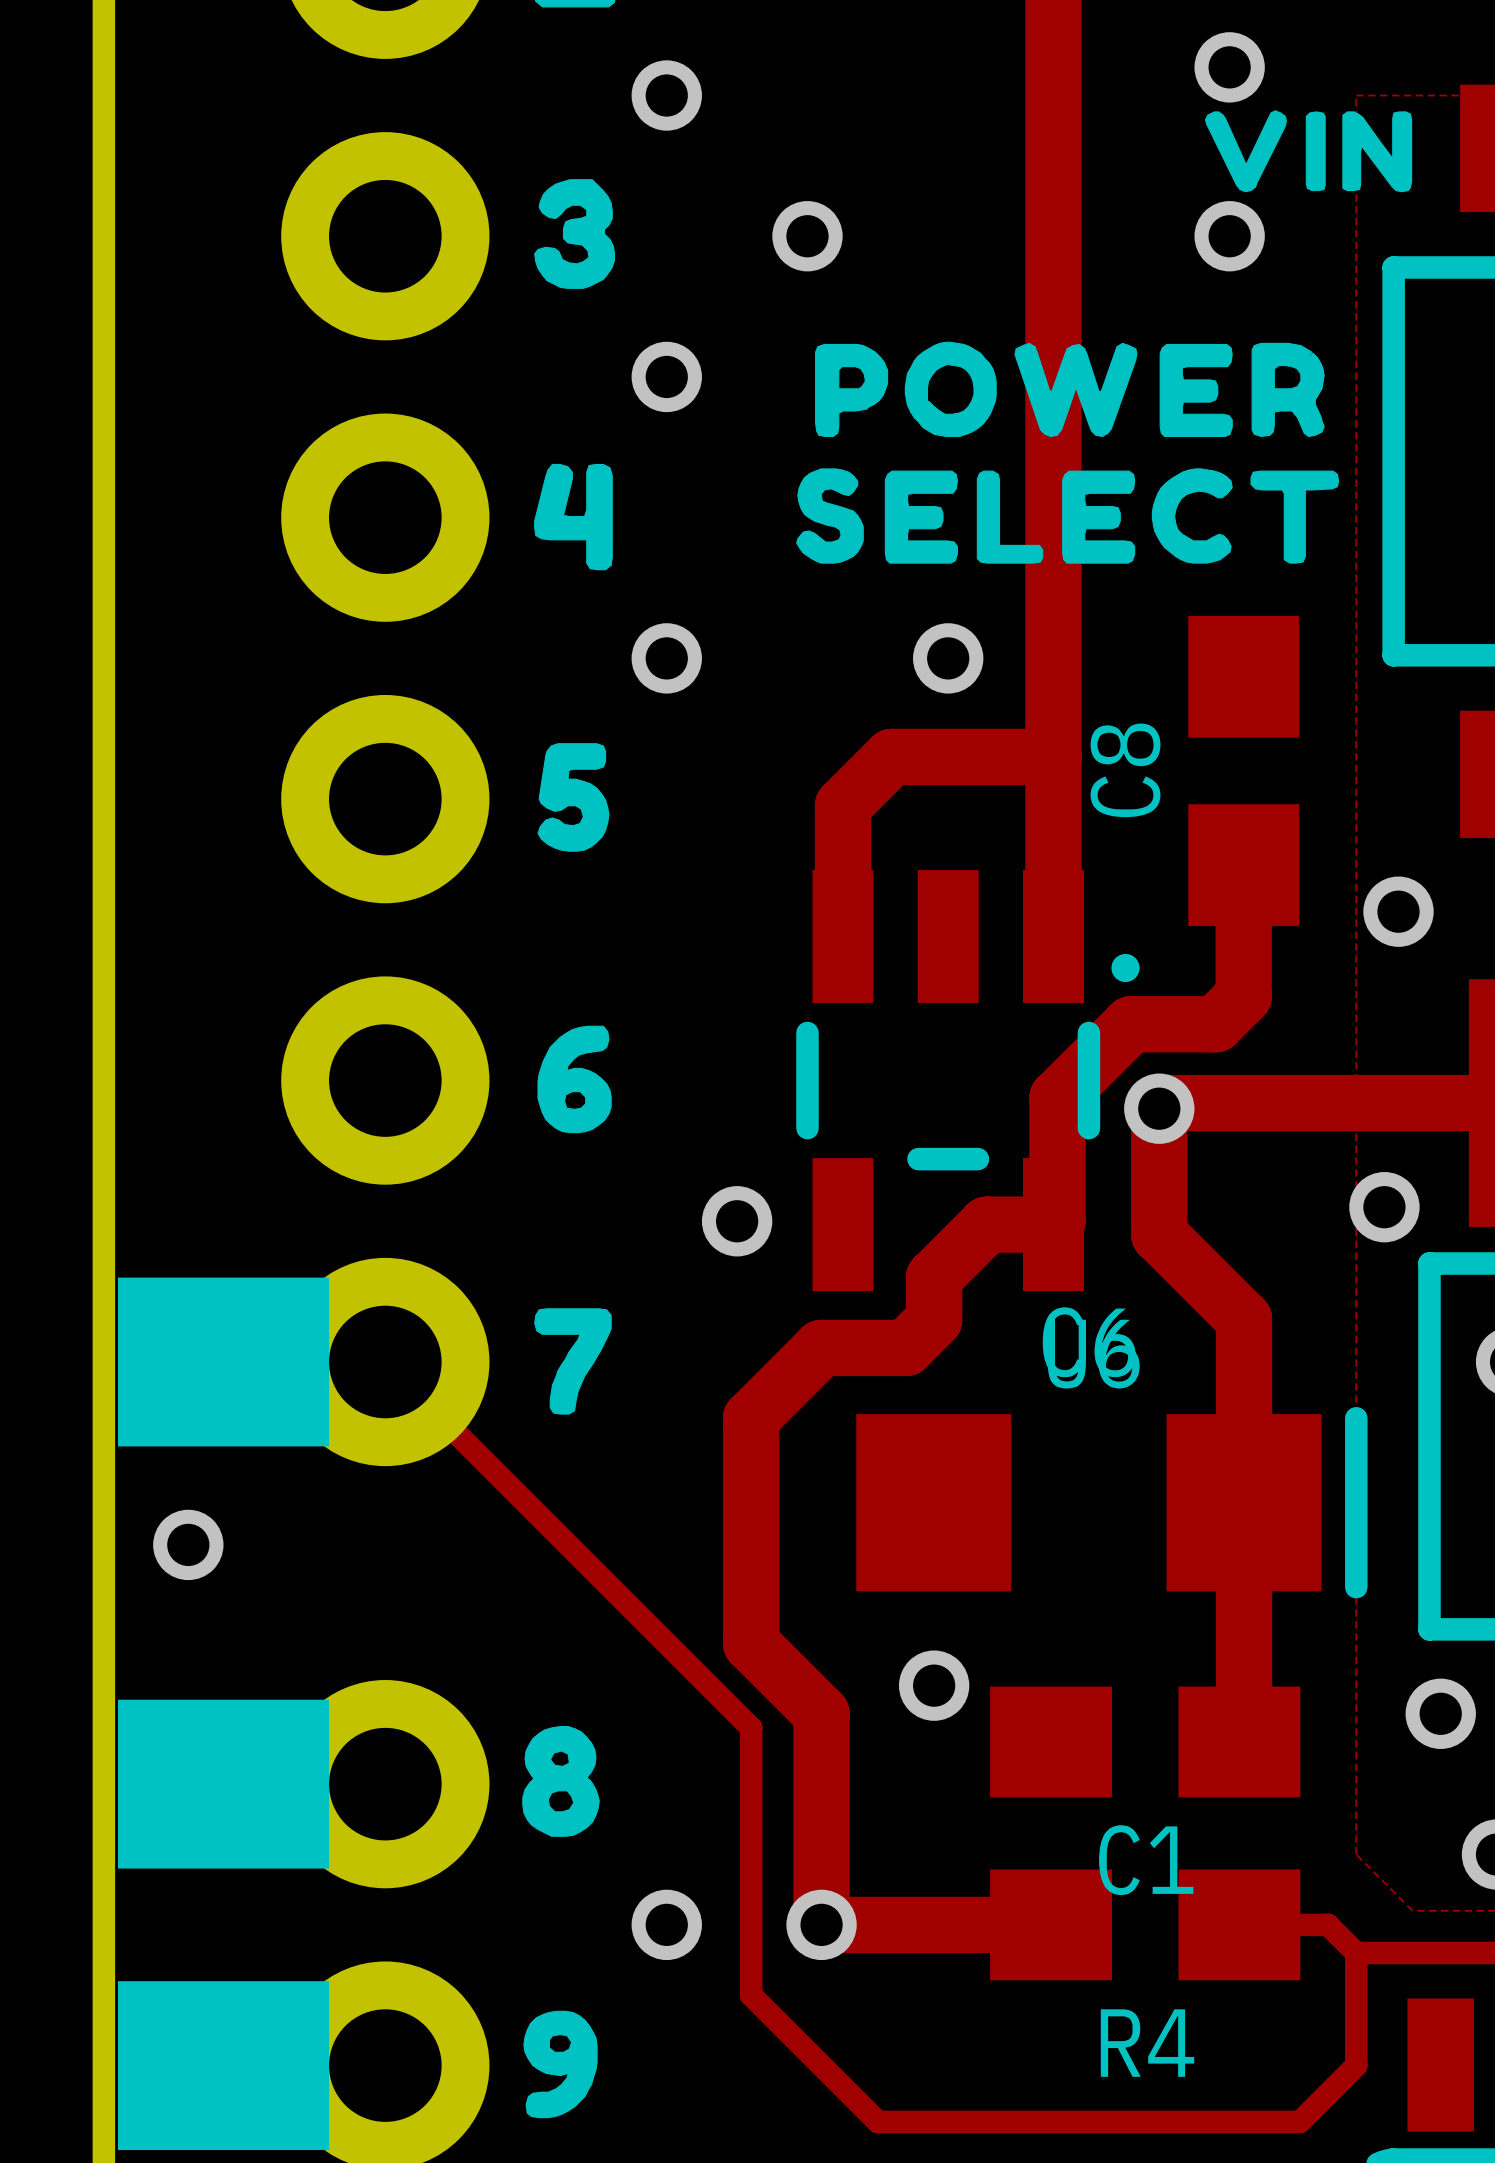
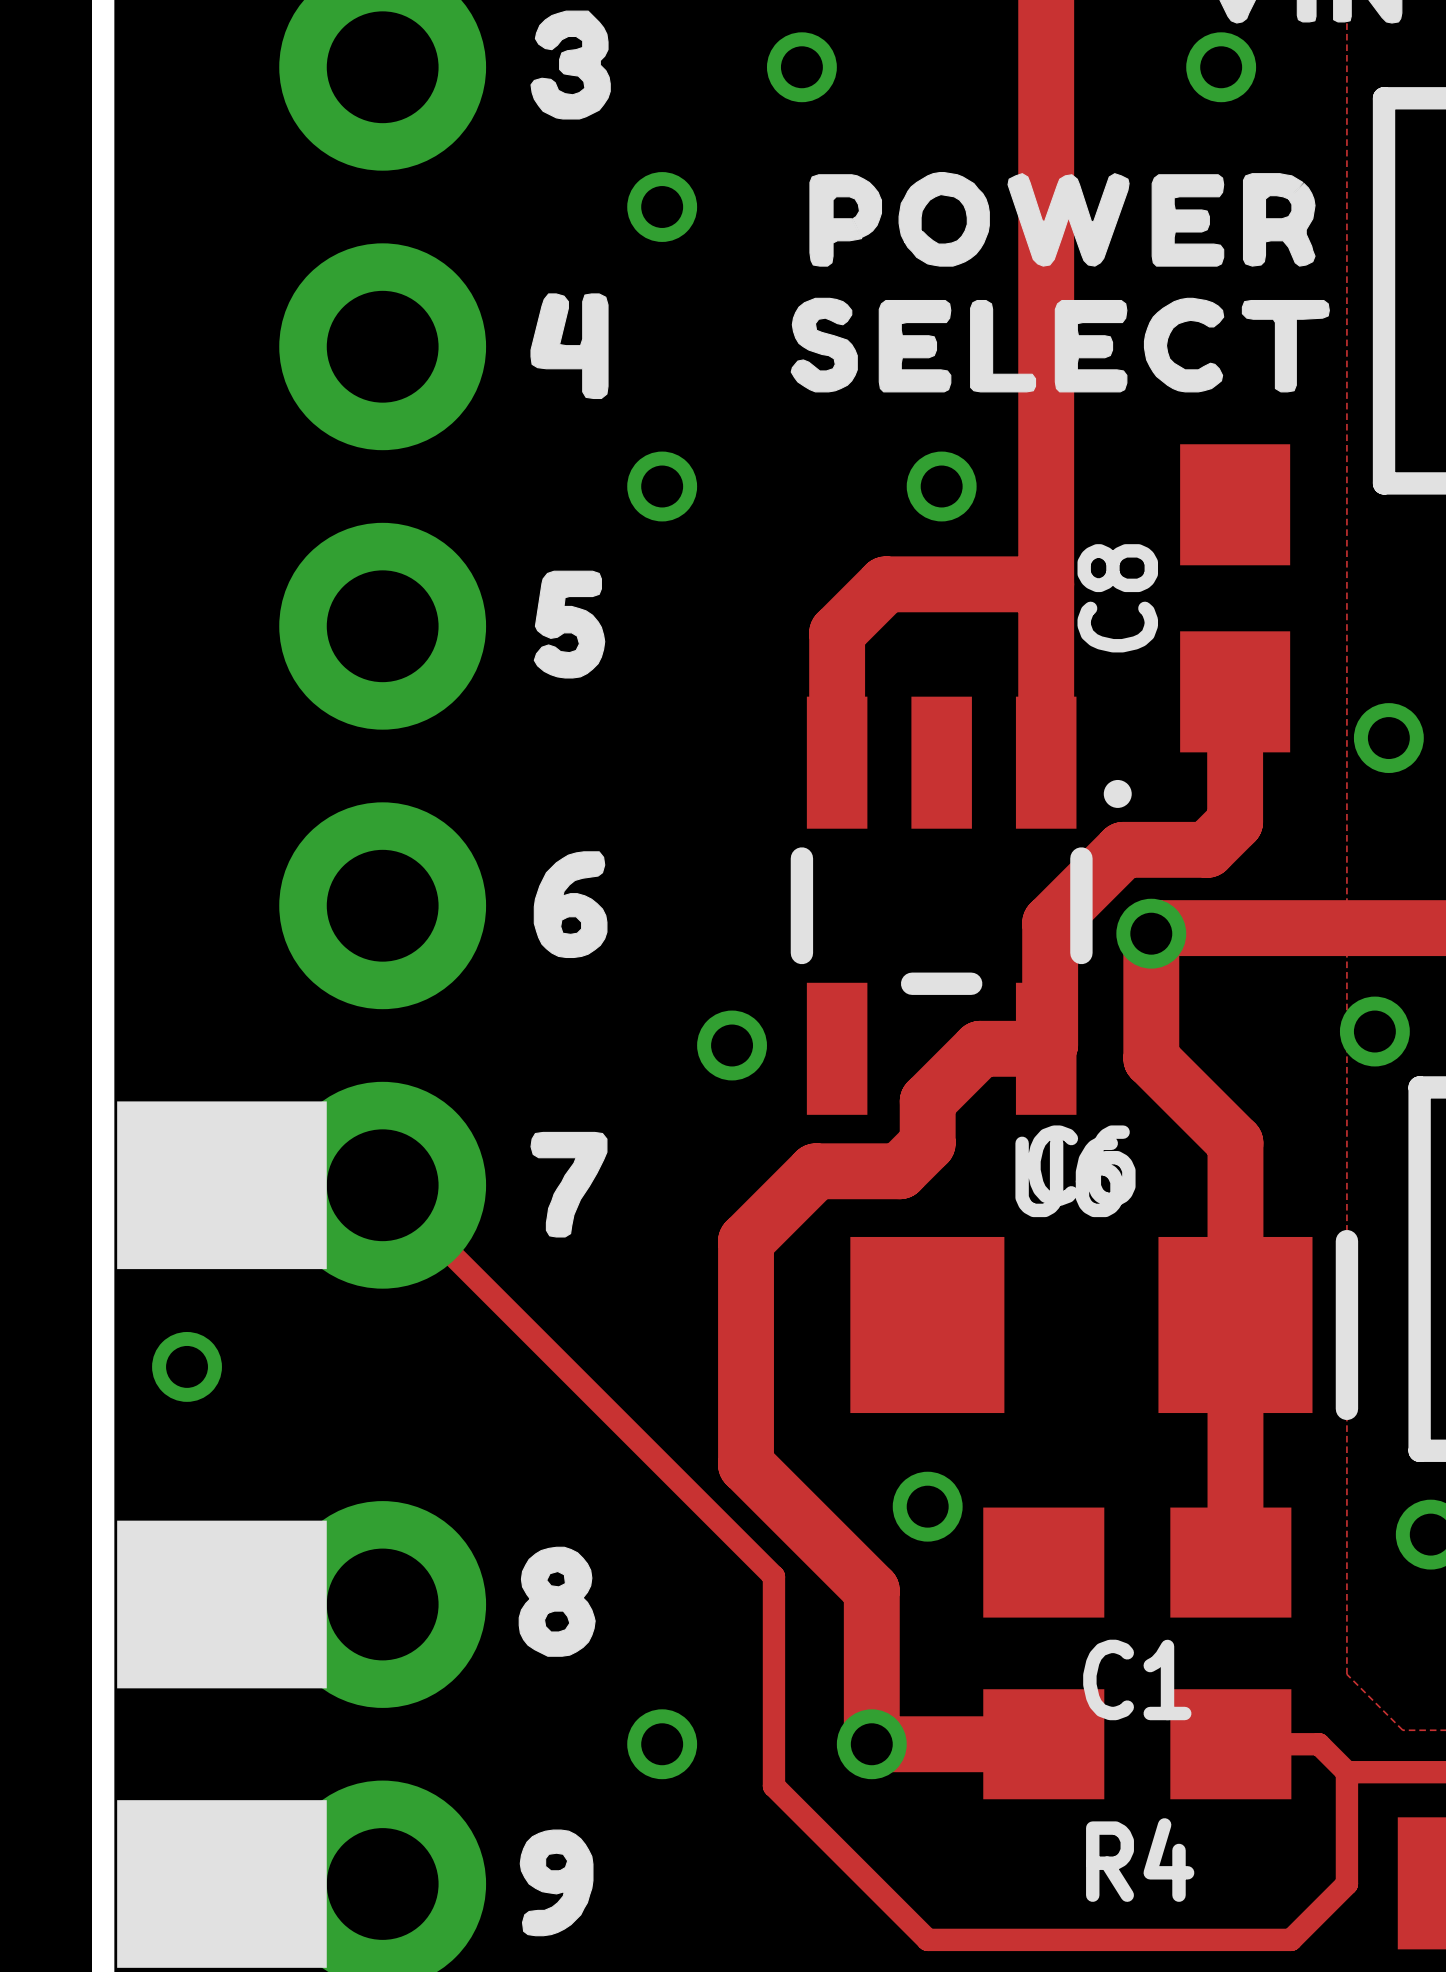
track: (821, 1713) (821, 1924) (877, 1924) -> (815, 1534) (871, 1590) (871, 1744)
track: (751, 1727) (751, 1995) (877, 2121) (934, 2121) -> (746, 1548) (773, 1576) (773, 1786) (927, 1939)
via position: (821, 1924) -> (871, 1744)

